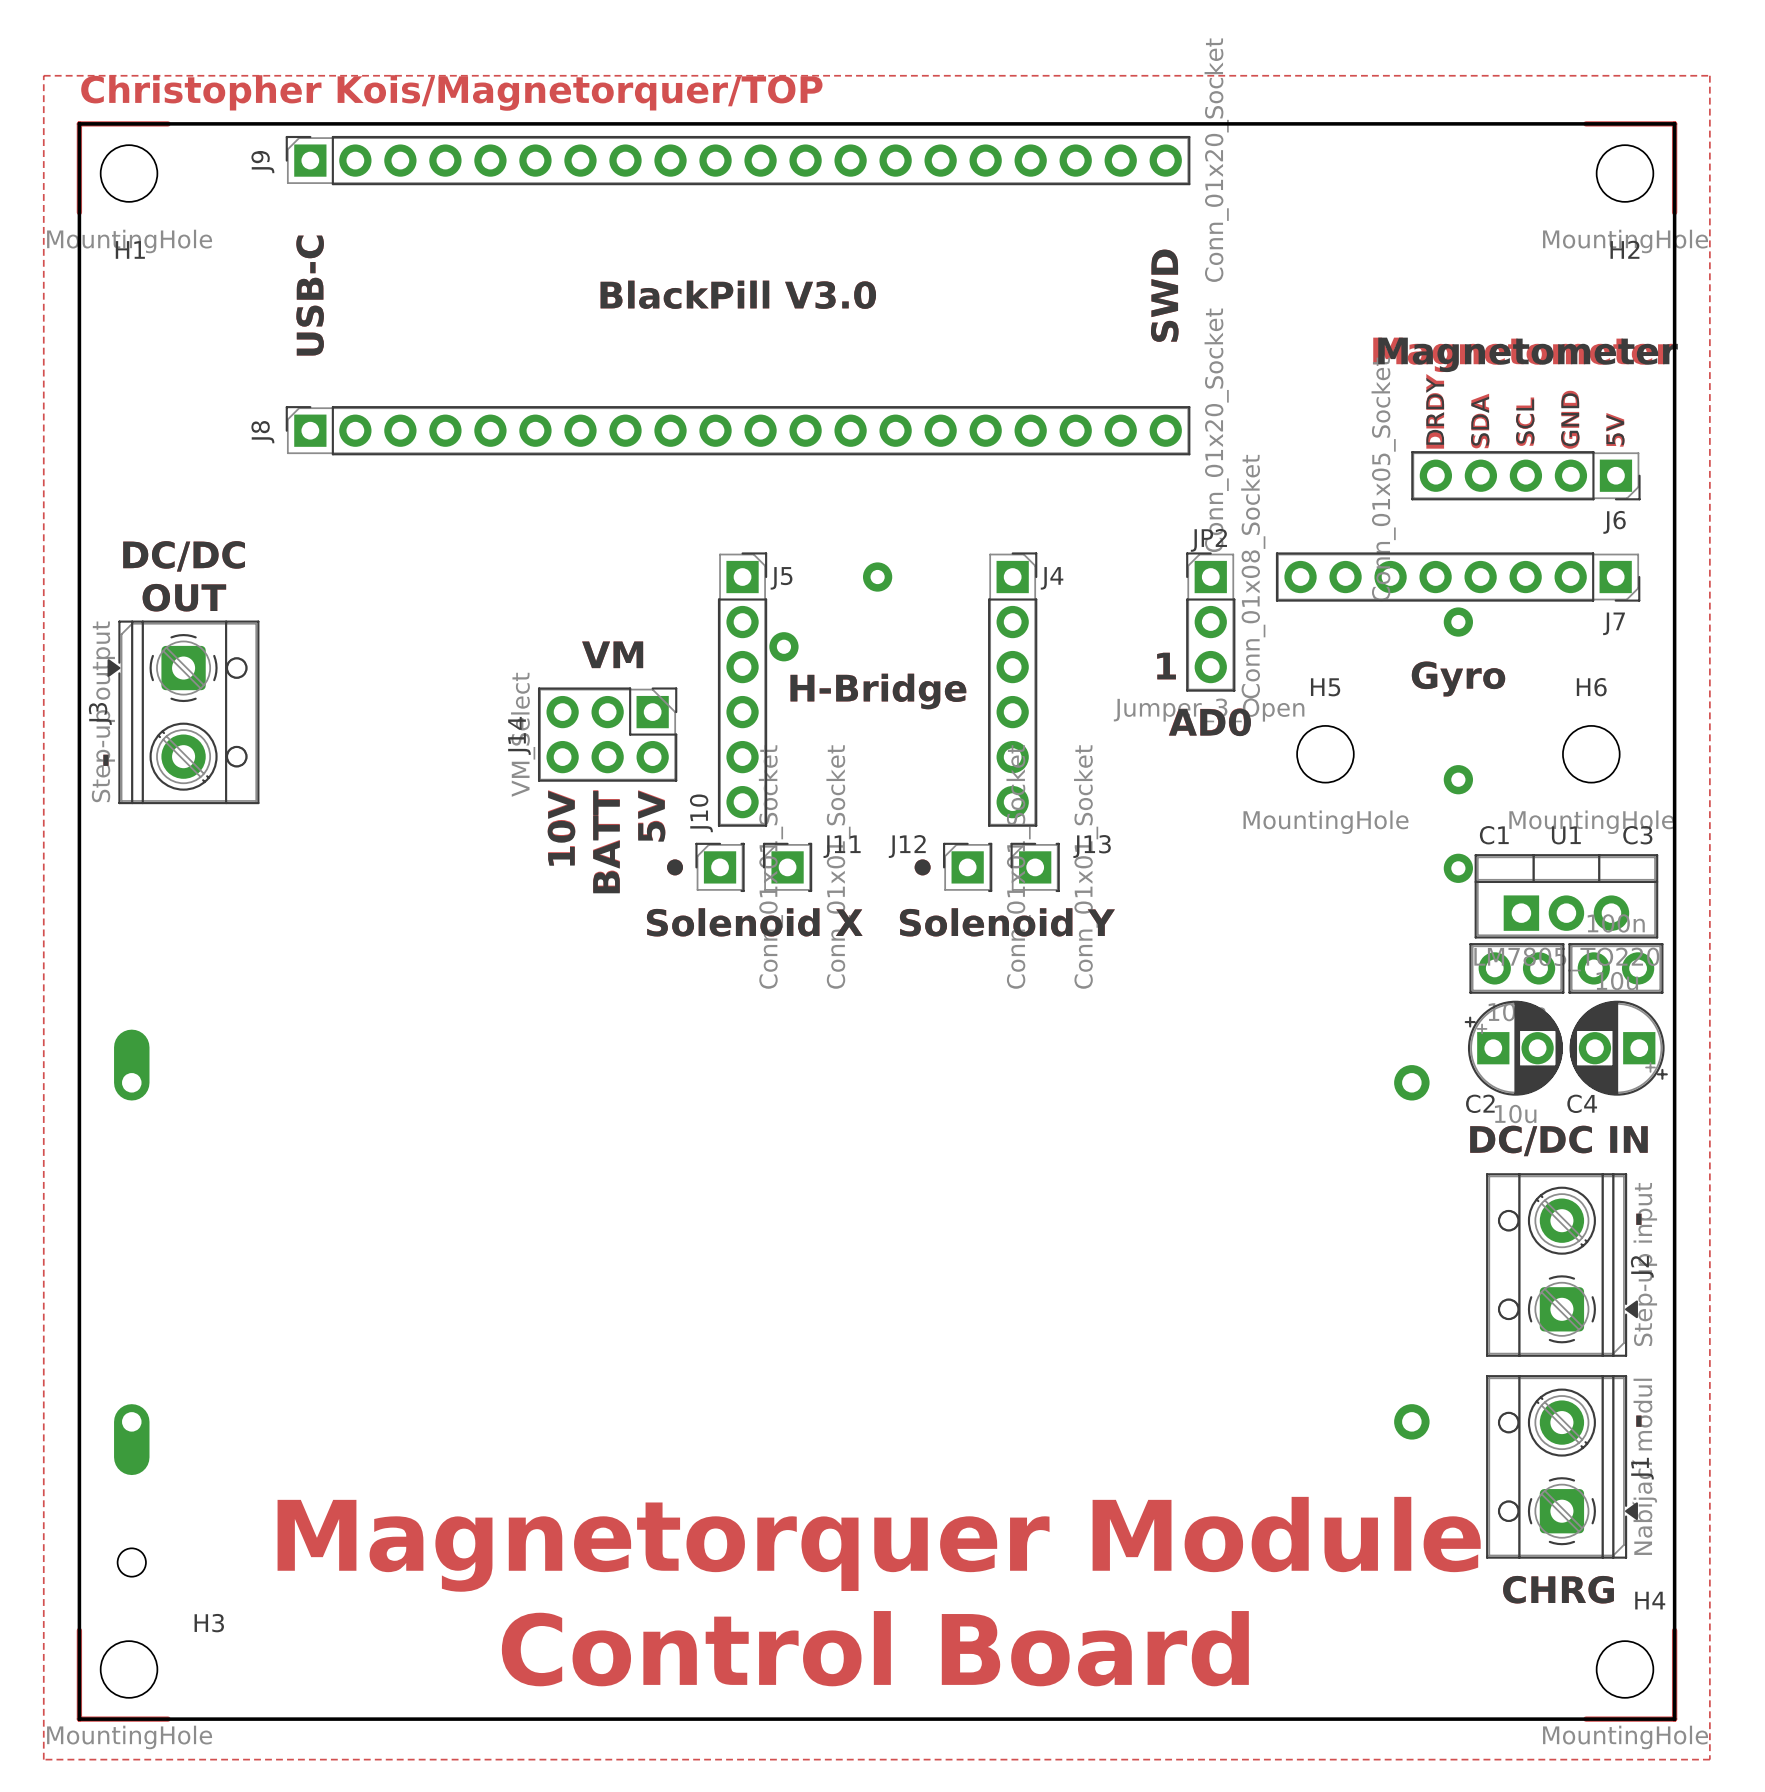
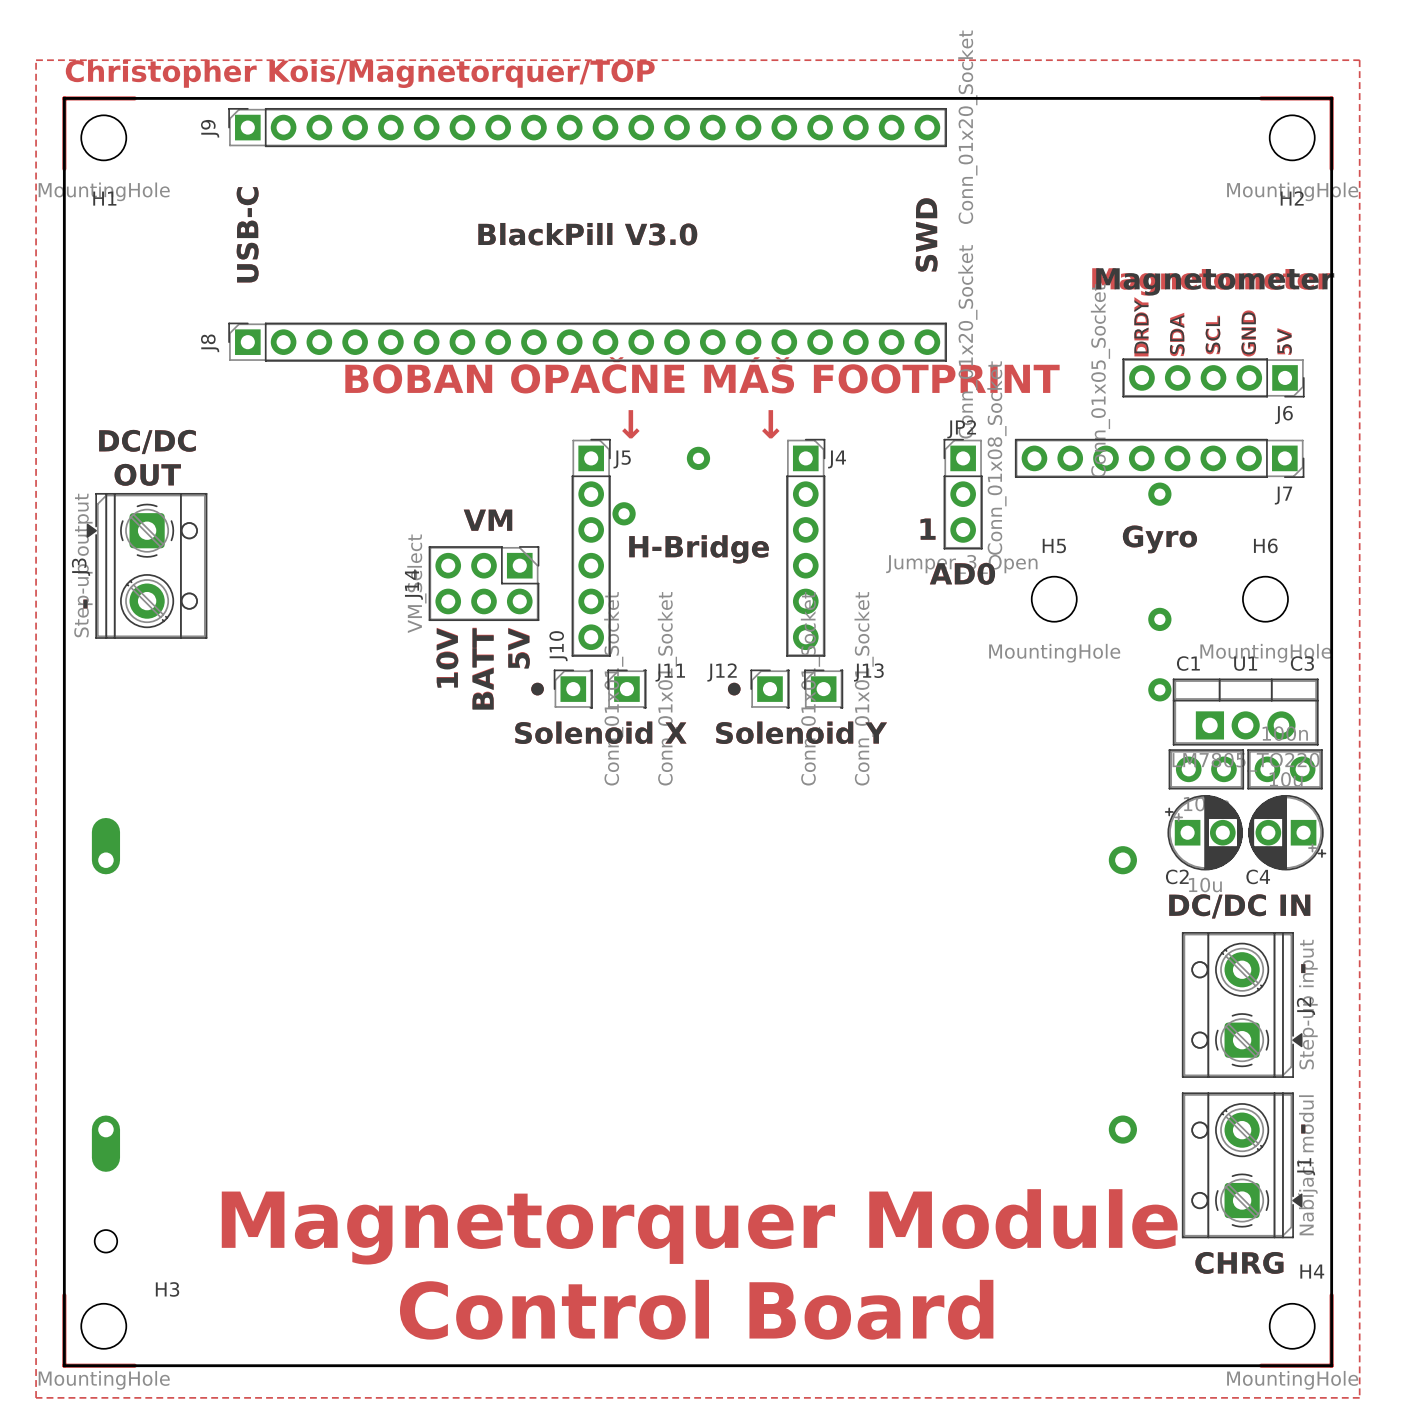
text: none -> BOBAN OPAČNE MÁŠ FOOTPRINT (702, 375)
text: none -> ↓ ↓ (700, 424)

